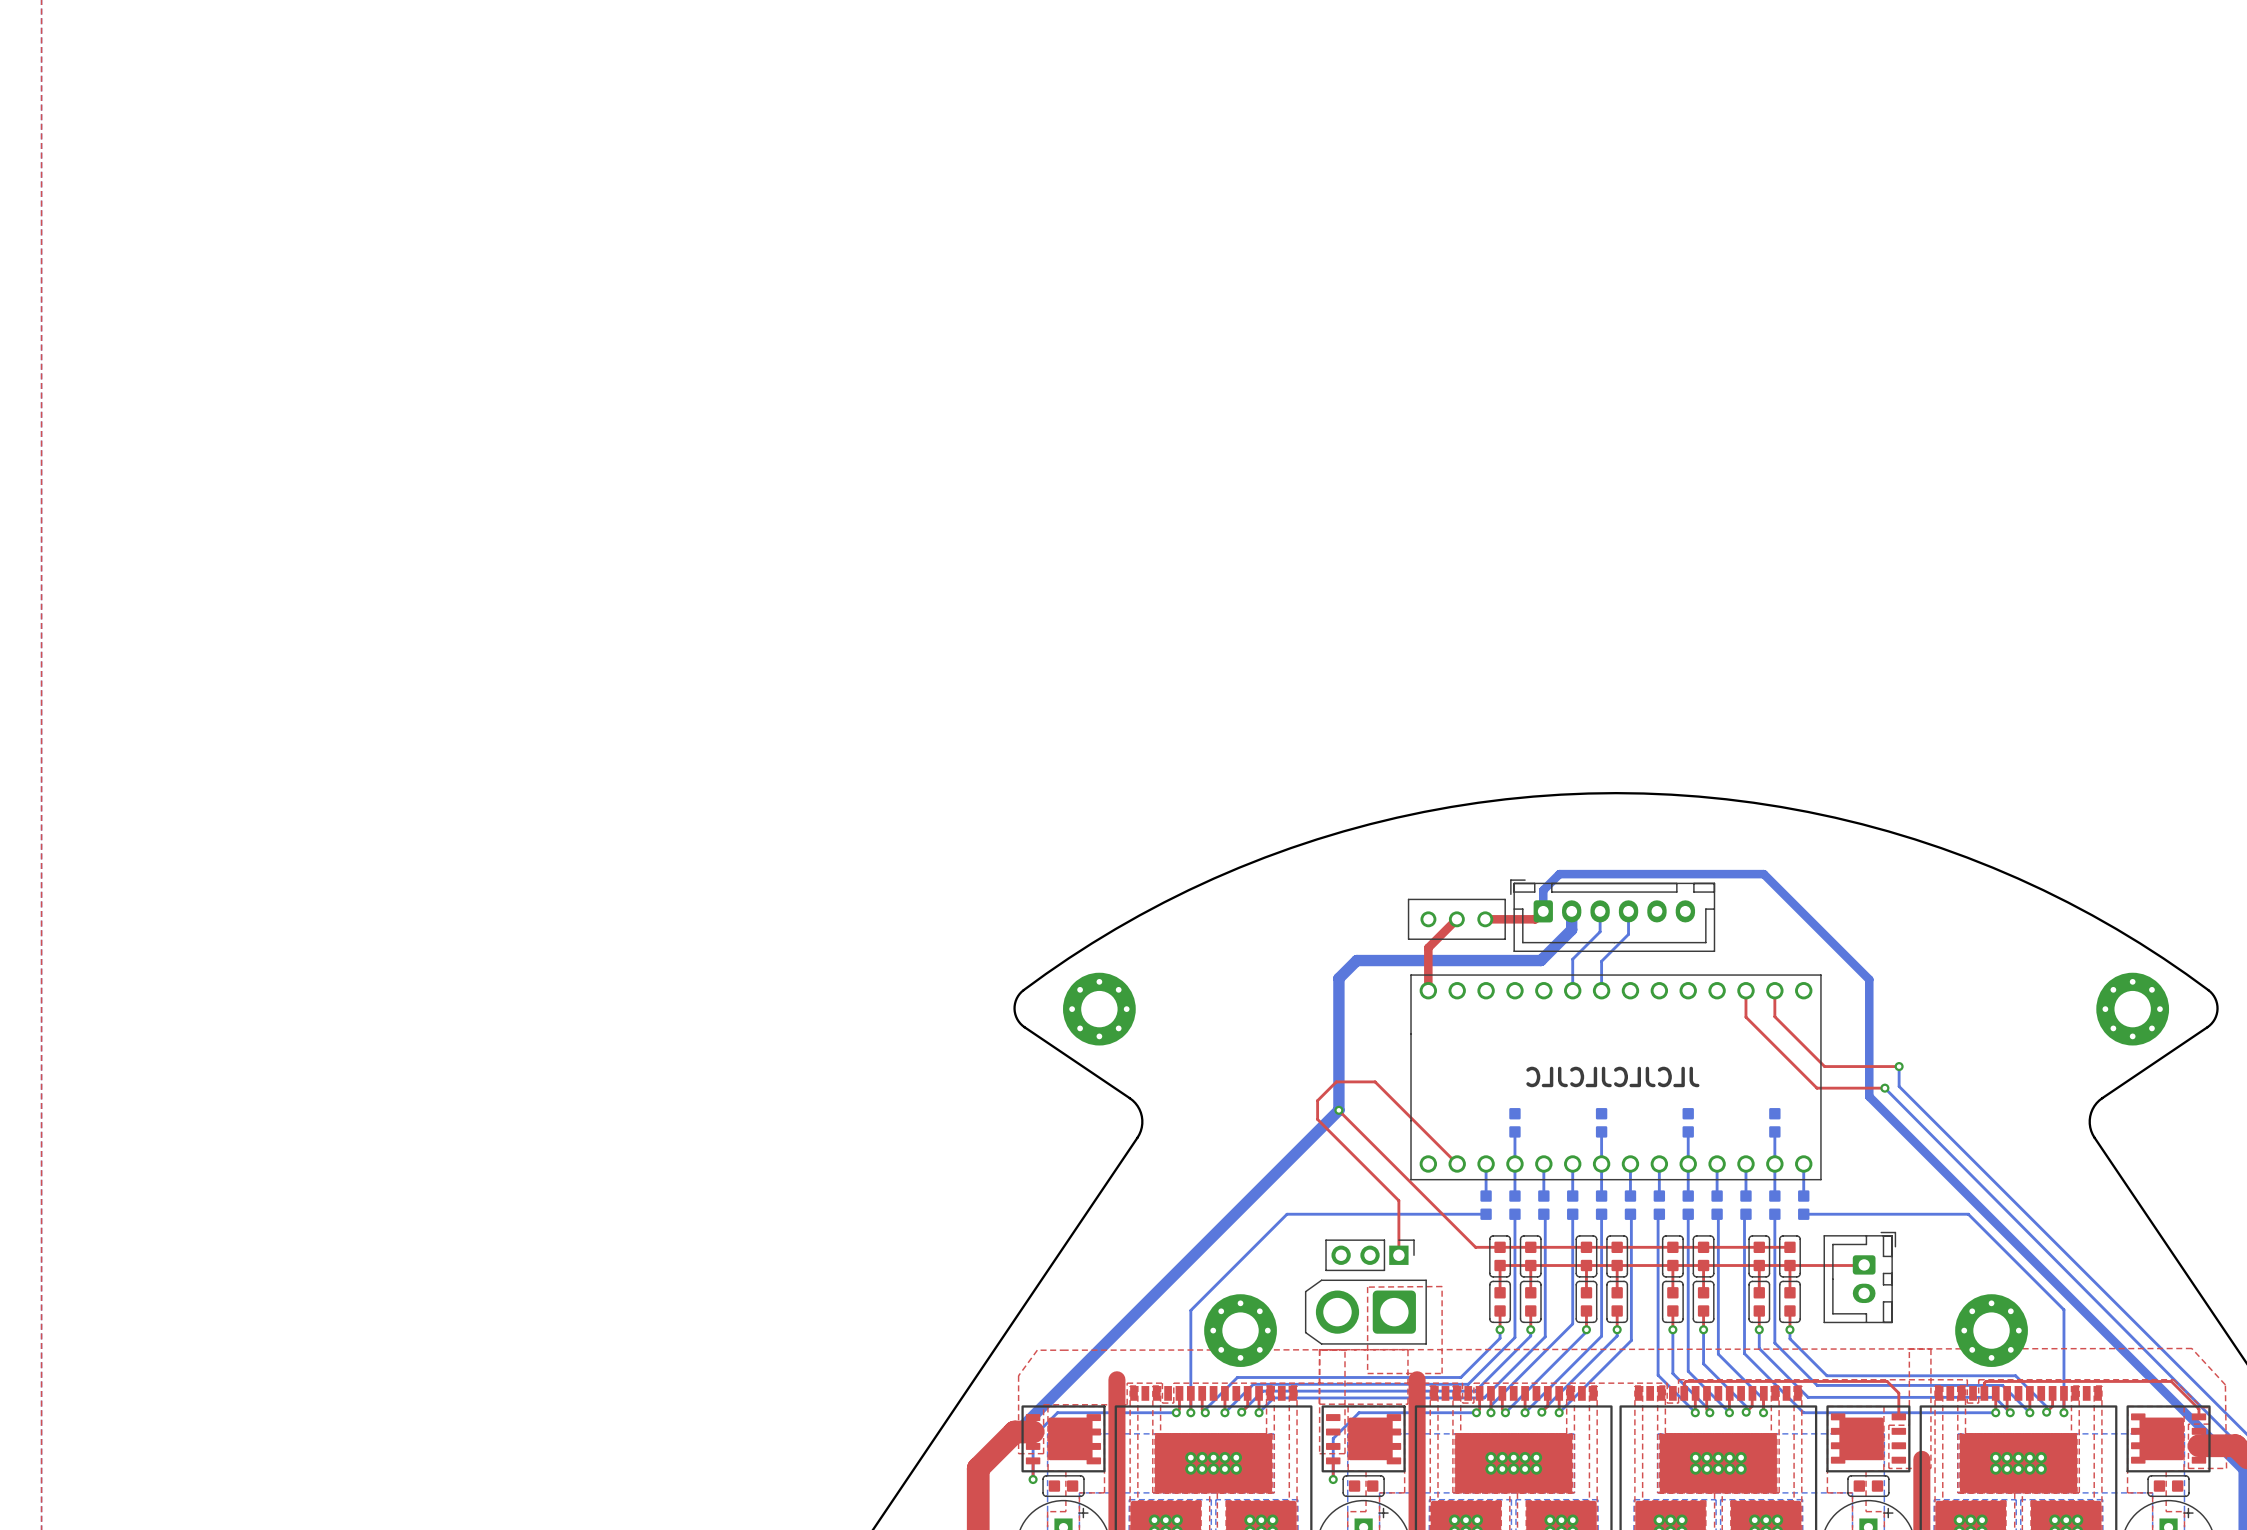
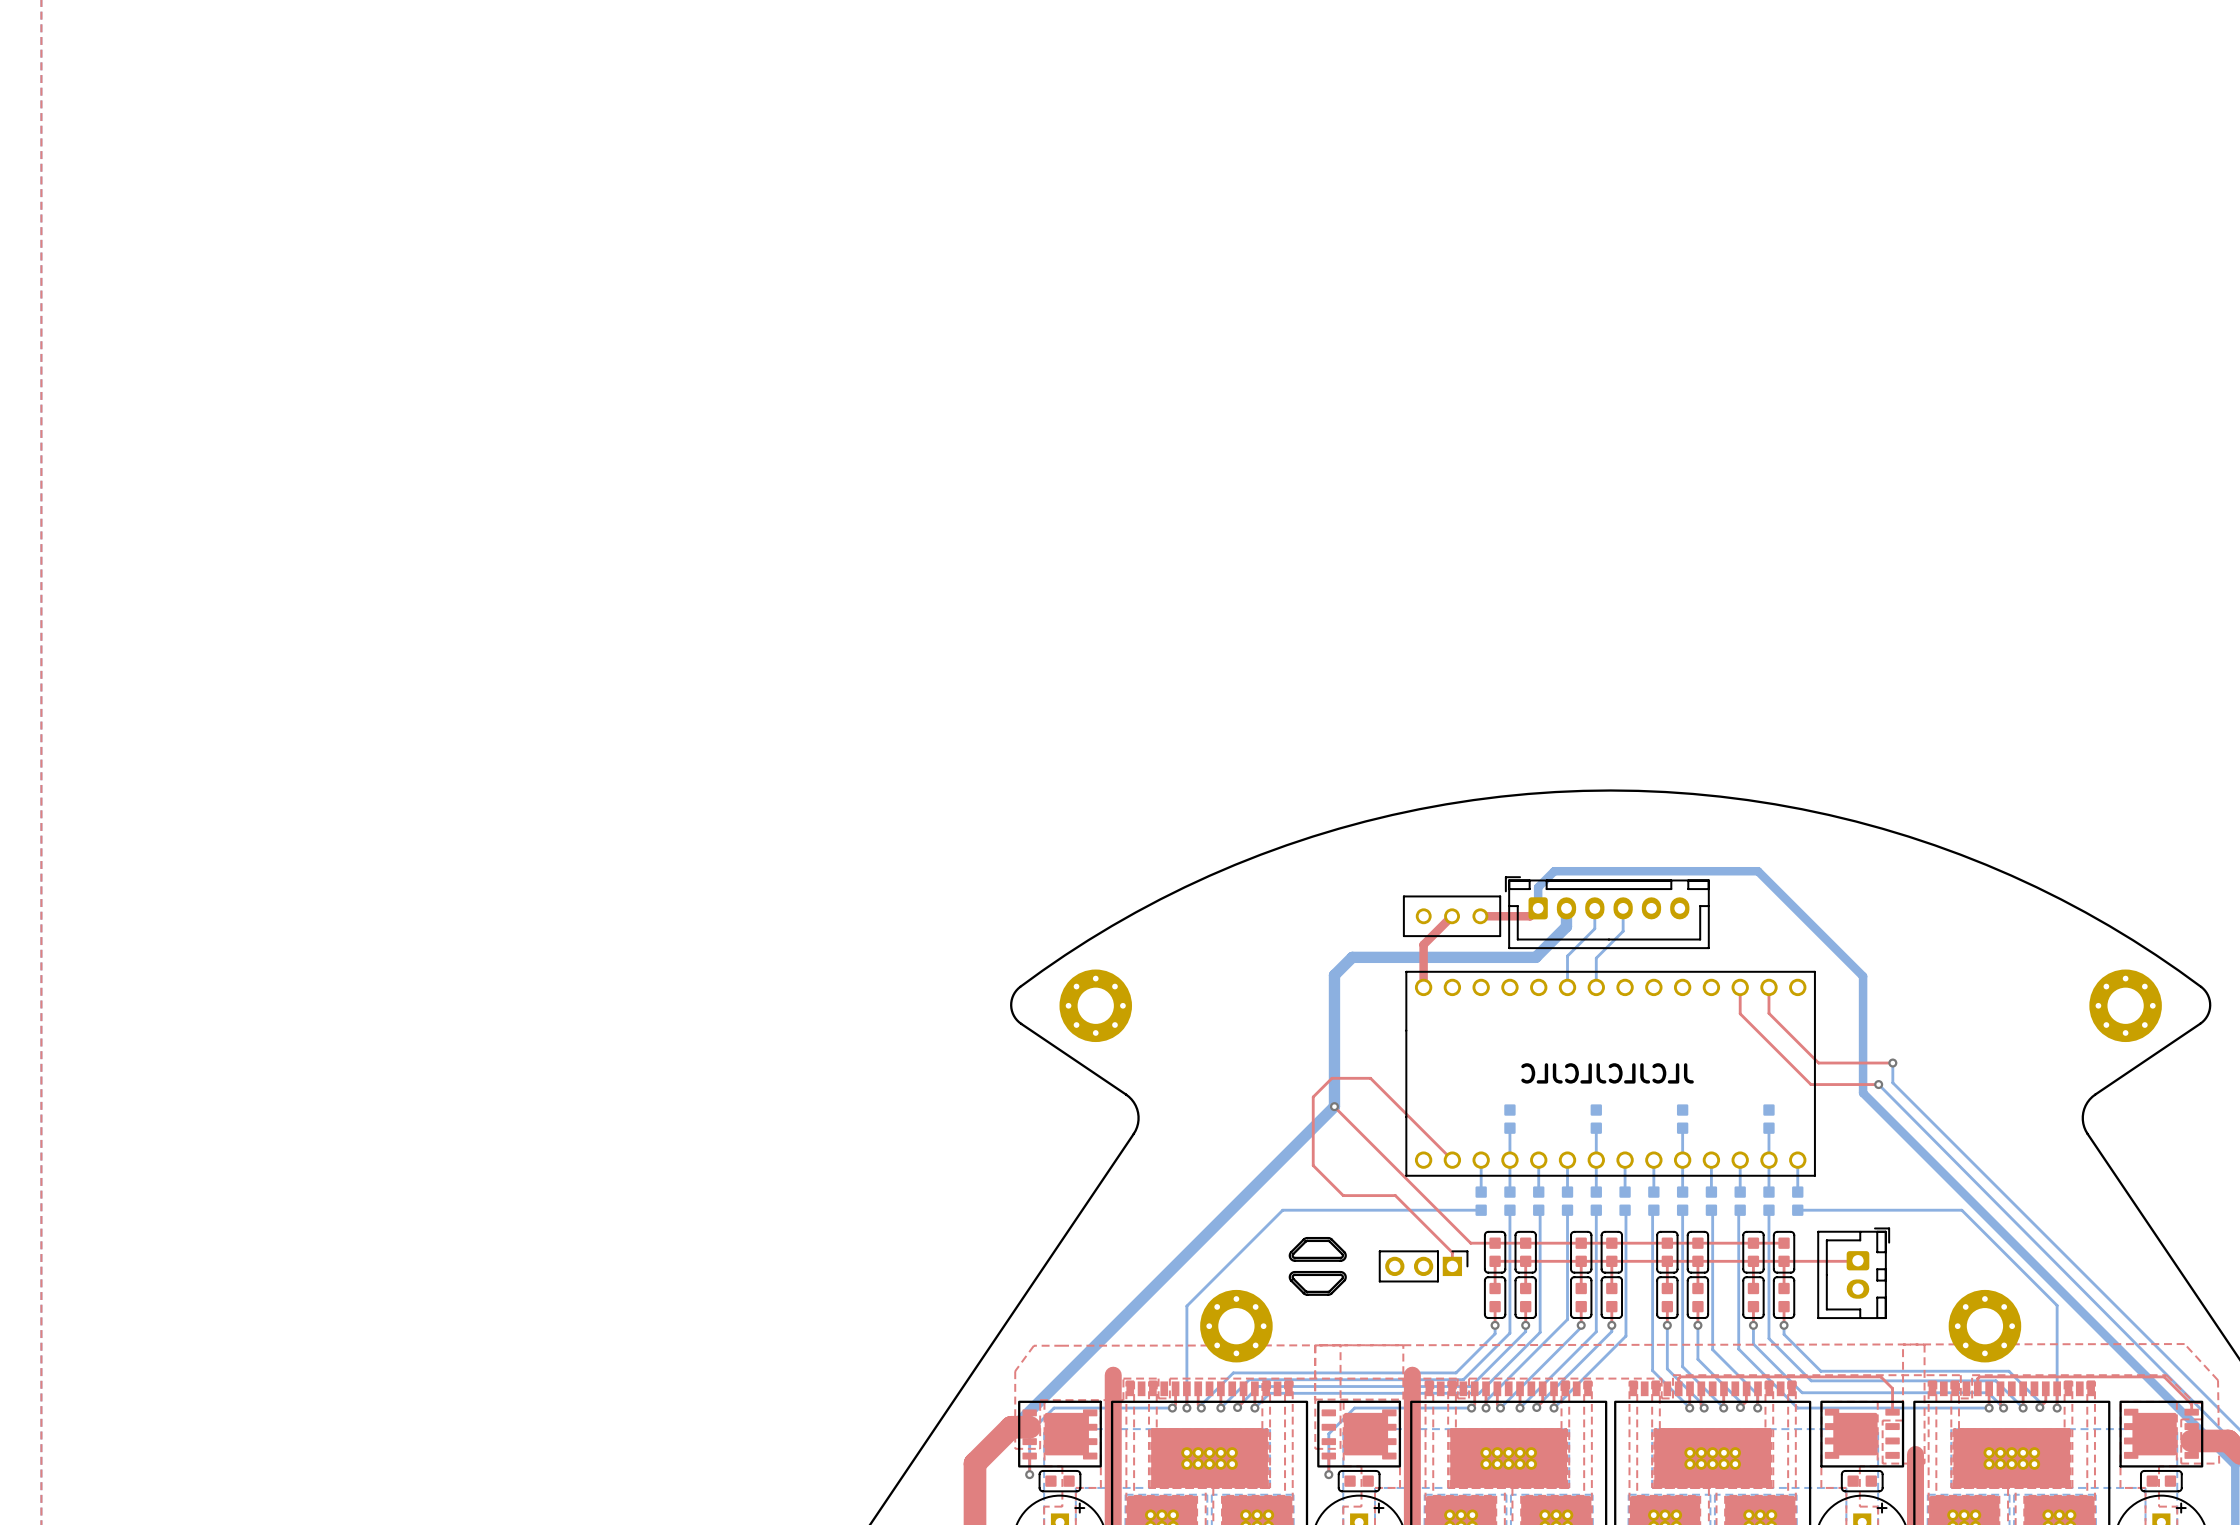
top track: (1317, 1119) (1398, 1200) (1398, 1255) -> (1313, 1115) (1313, 1165) (1343, 1195) (1395, 1195) (1452, 1252) (1452, 1266)
drawing: none -> [1288, 1236, 1347, 1296]
part position: (1370, 1255) -> (1423, 1266)
top zone outline: (1442, 1286) (1442, 1373) (1367, 1373) (1367, 1287) (1442, 1286) -> none
part: (1365, 1312) -> none

